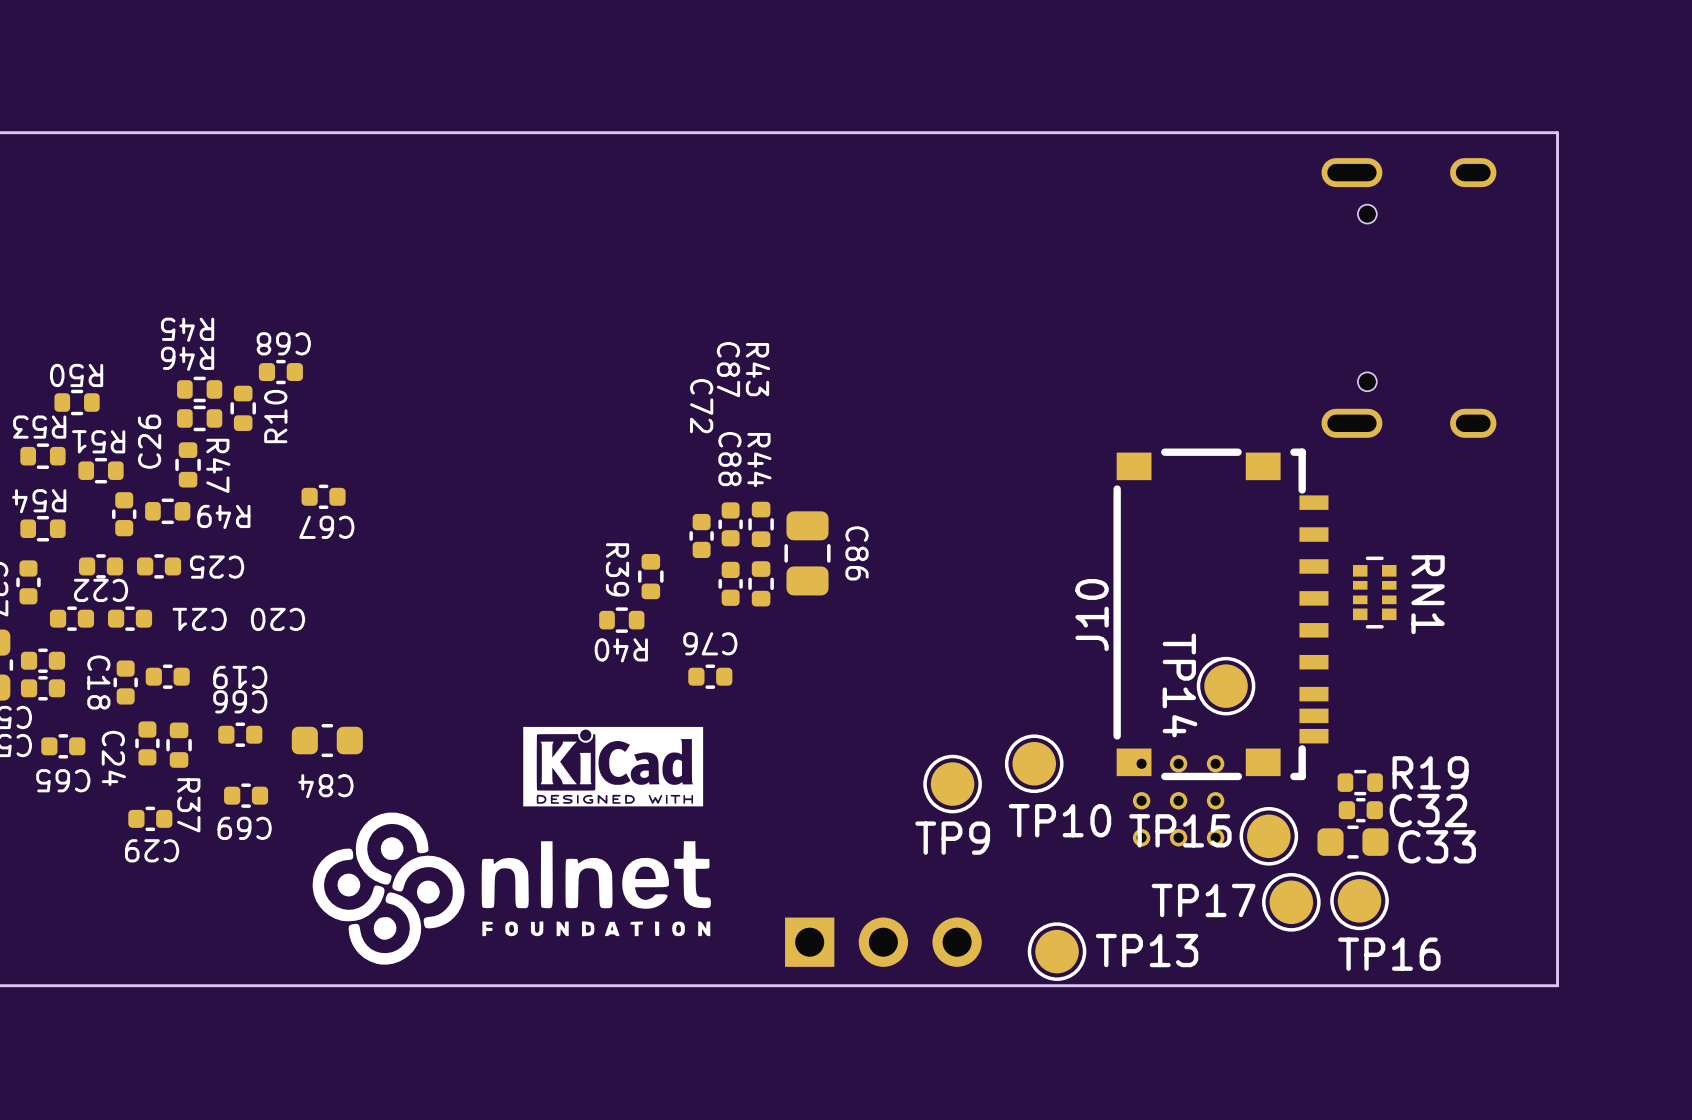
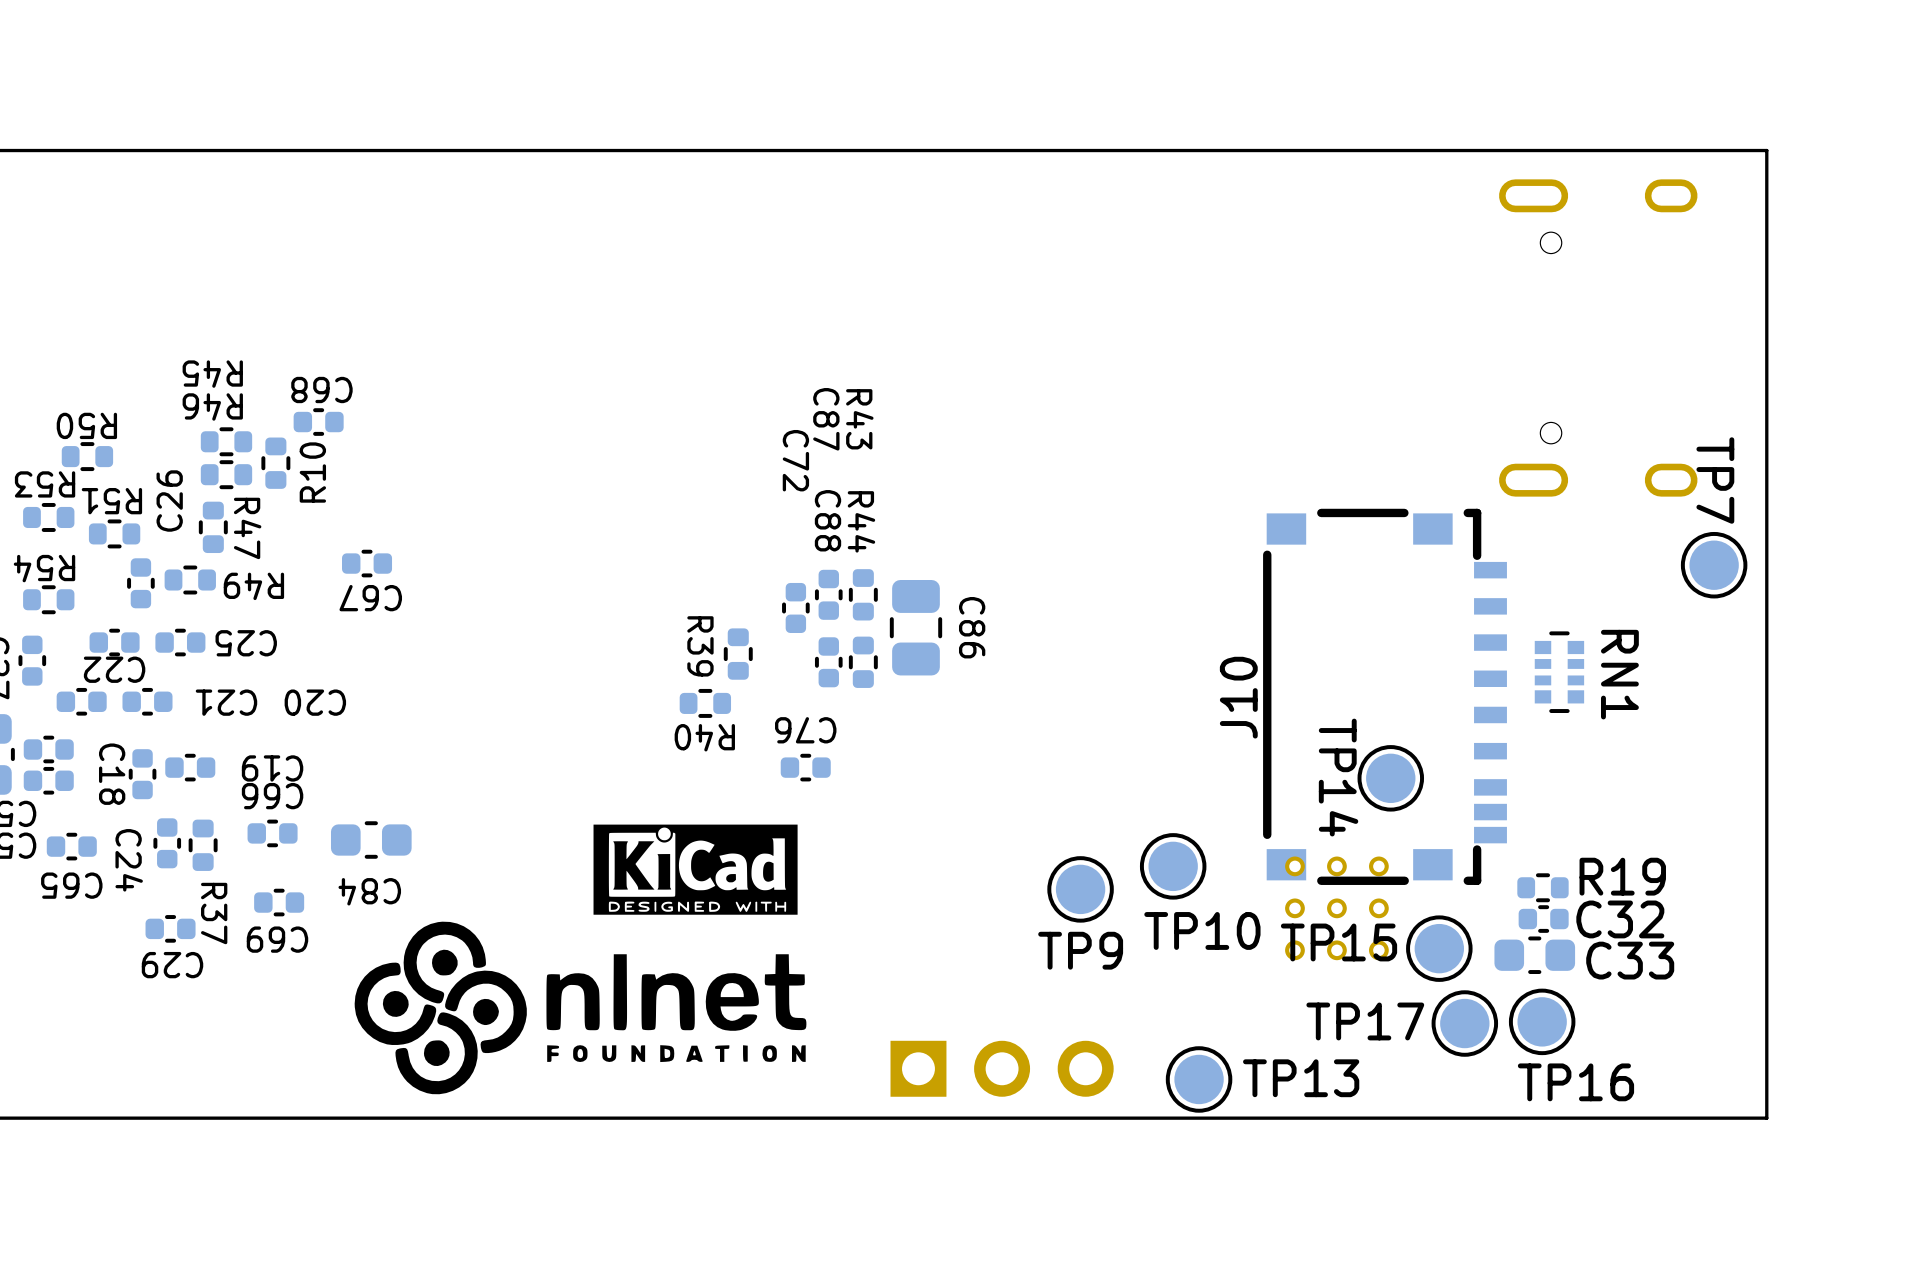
TP7: none -> (1714, 565)

